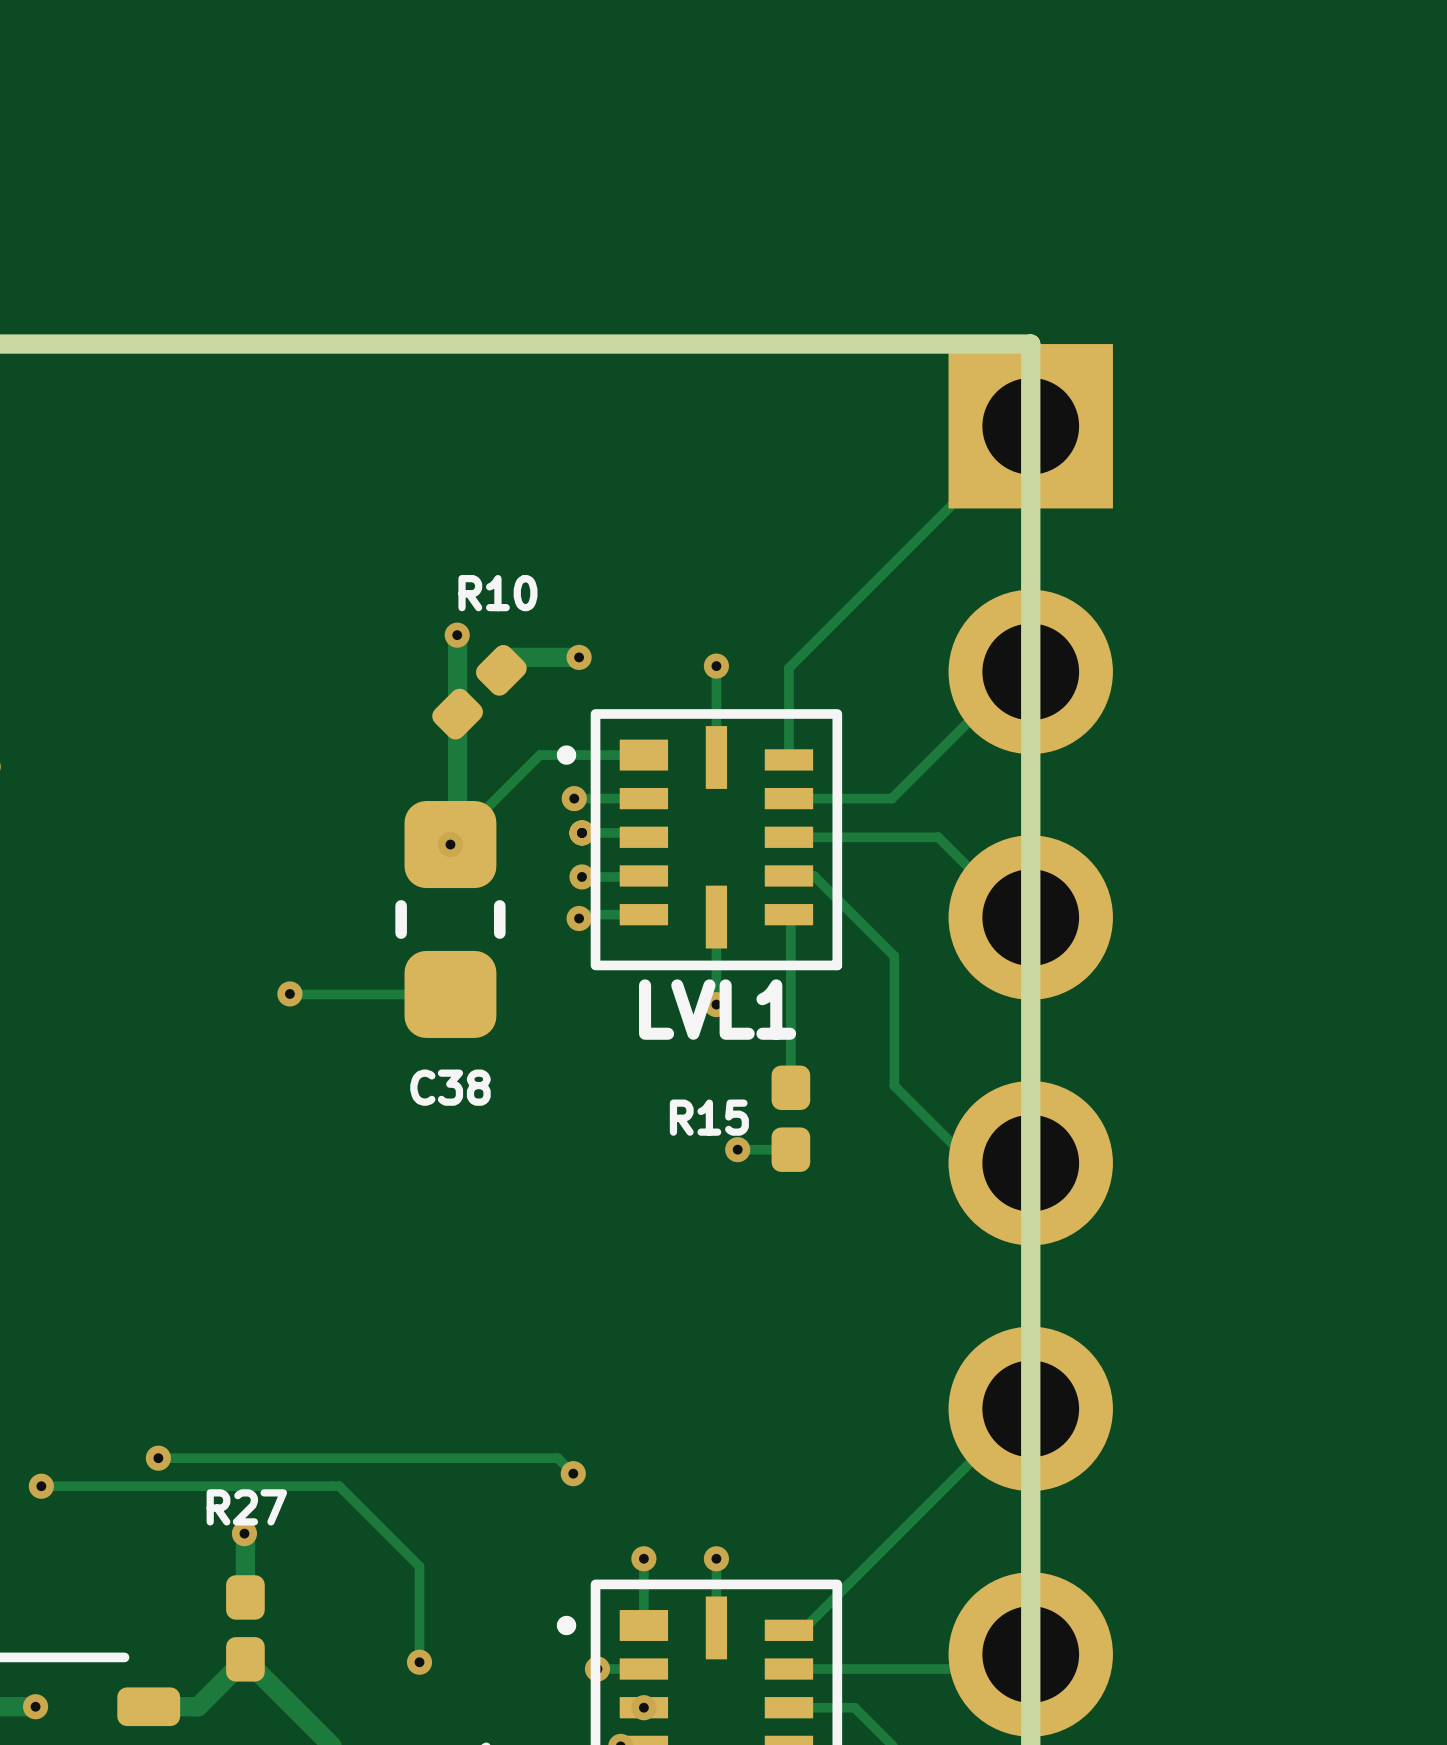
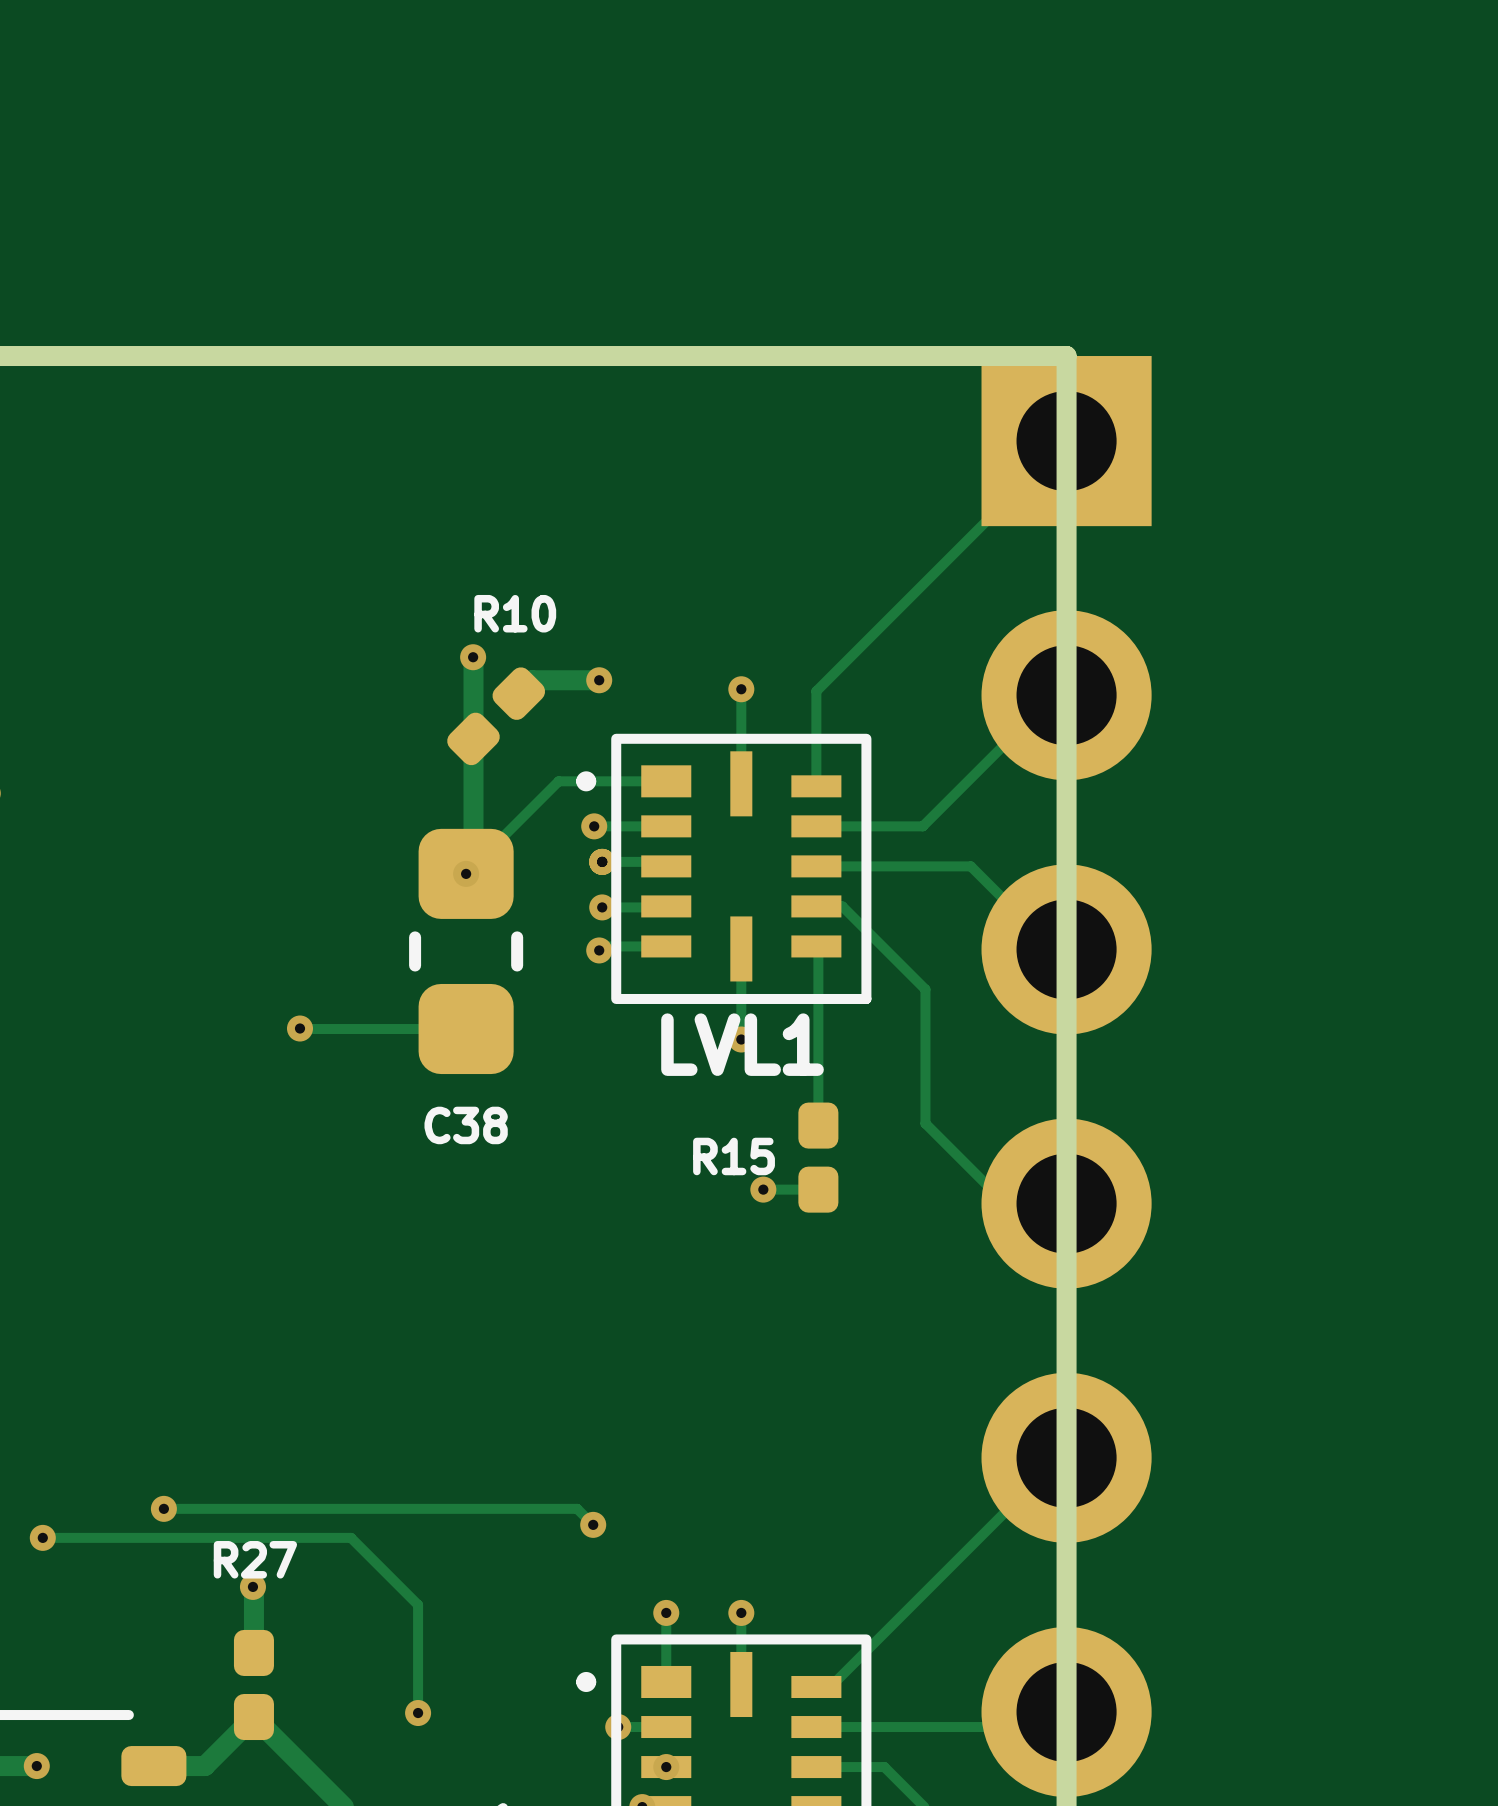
track: (404, 1551) (419, 1566) (419, 1662) -> (418, 1604) (418, 1713)
via position: (419, 1662) -> (418, 1713)

